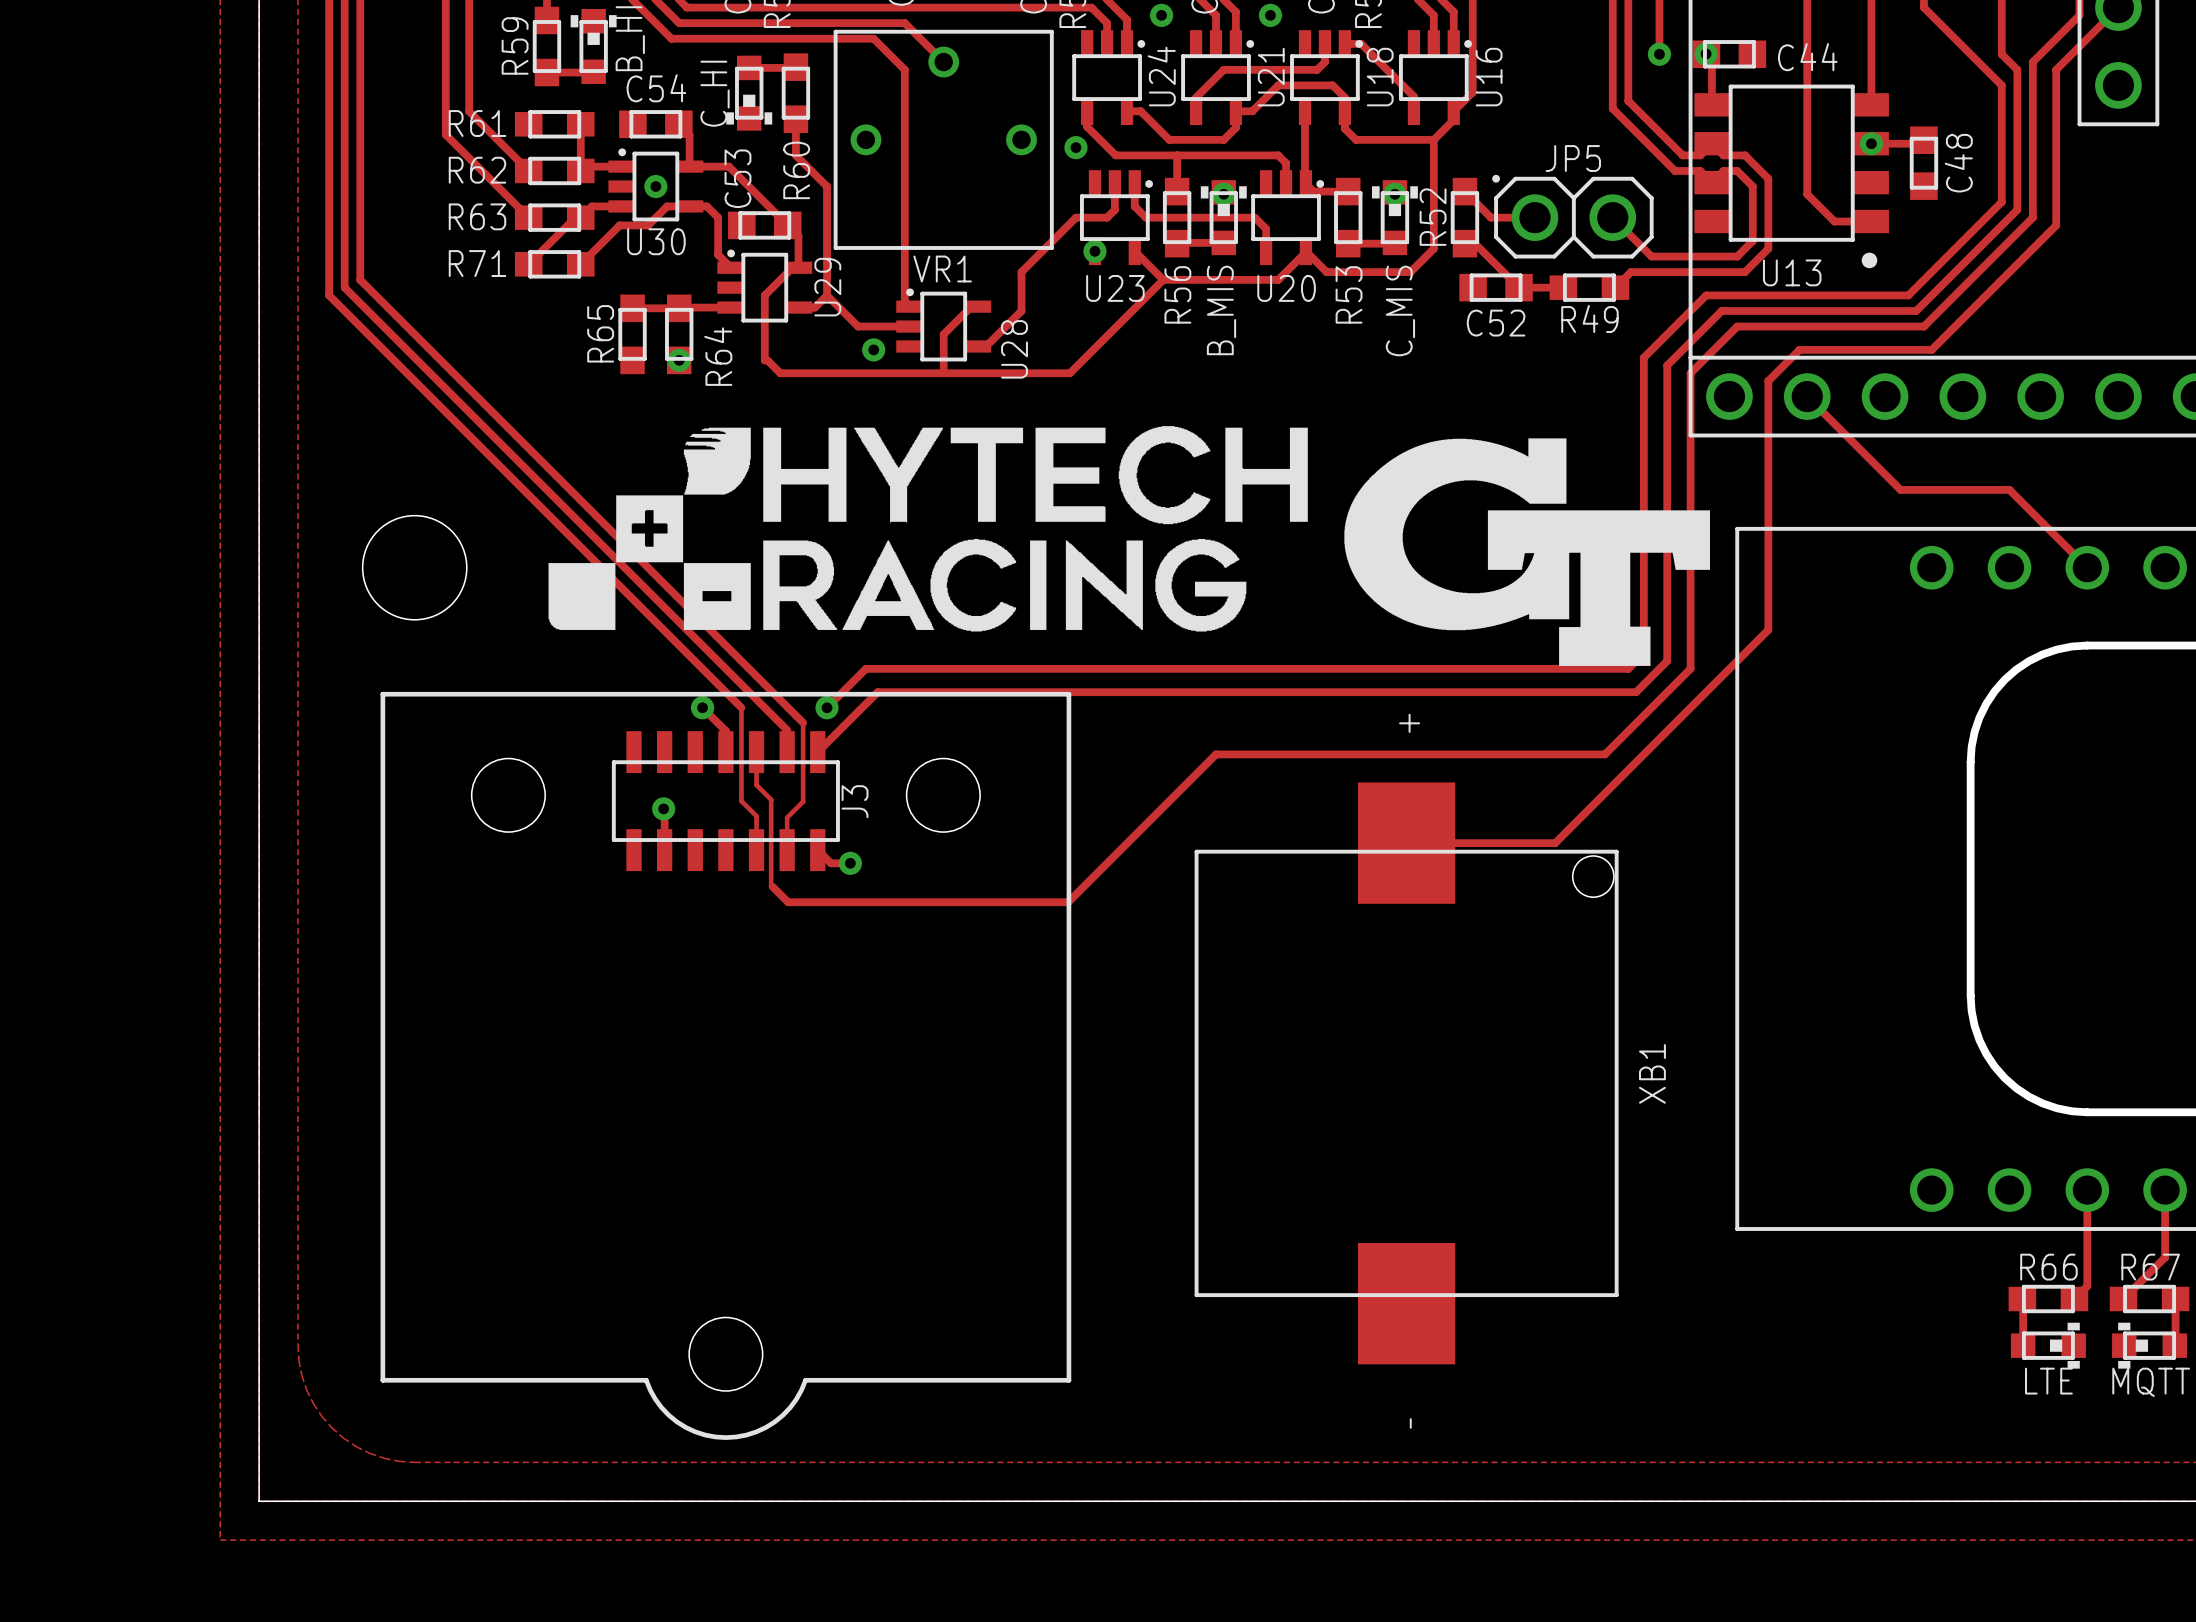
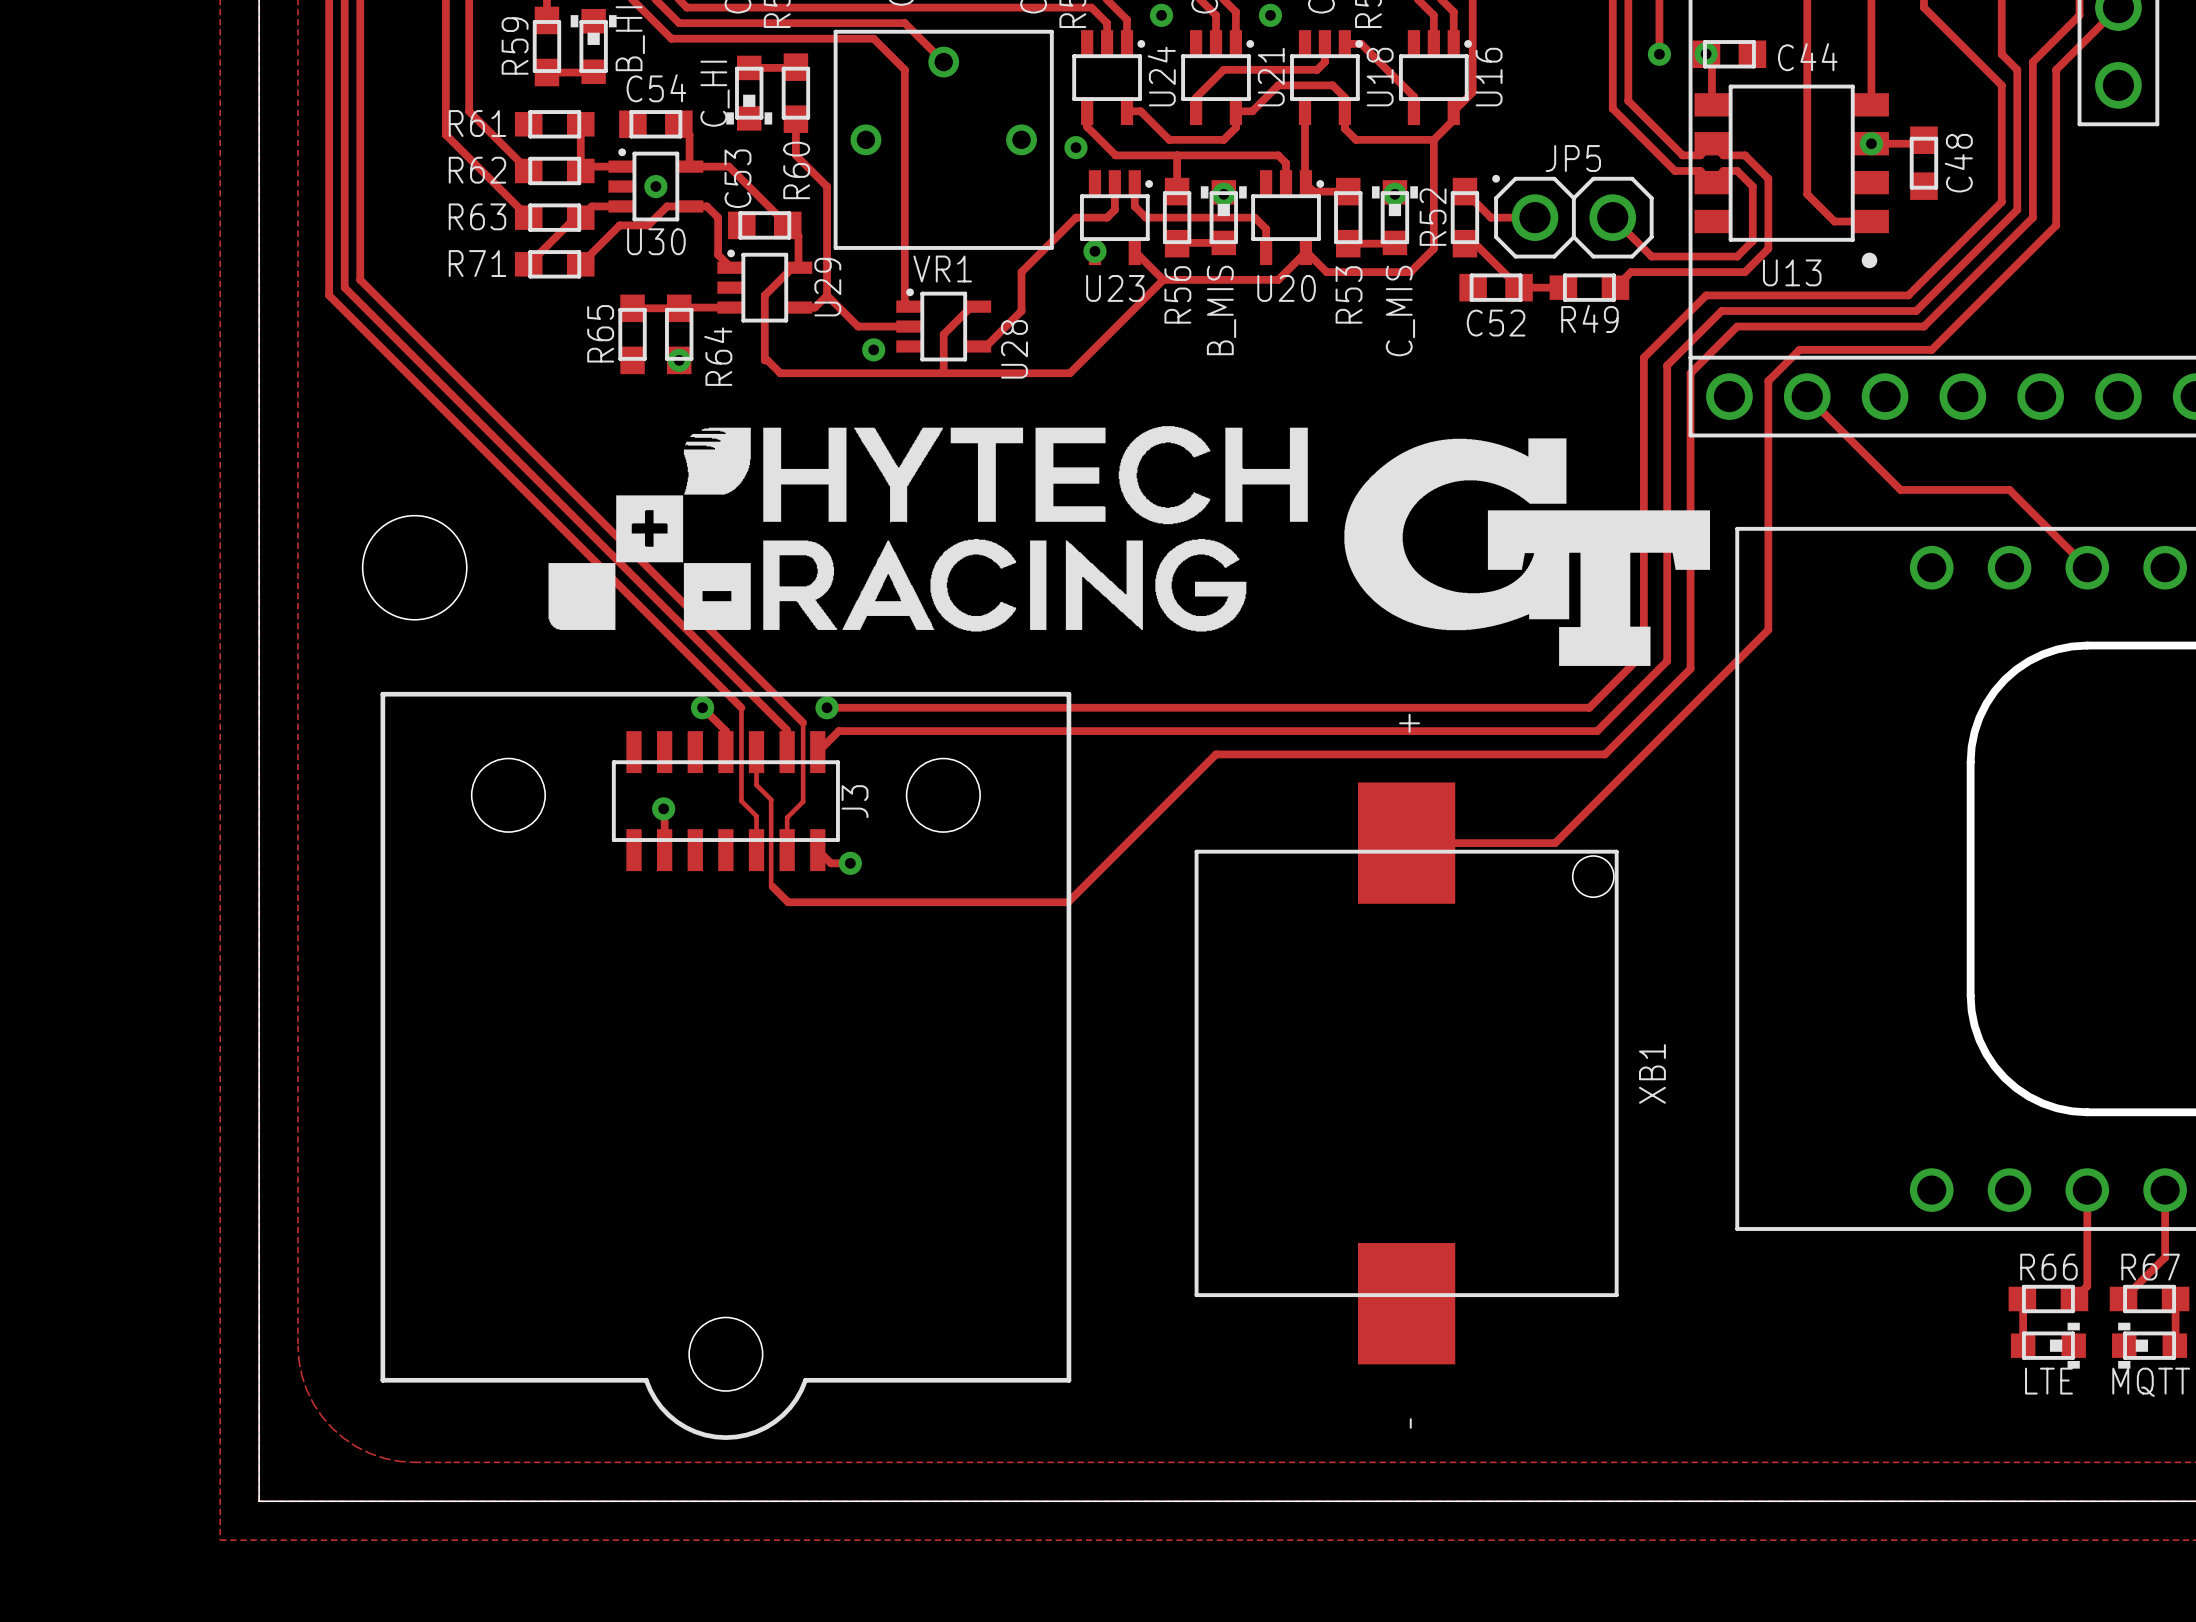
track: (1628, 668) (865, 668) (827, 707) -> (1628, 668) (1589, 707) (827, 707)
track: (1636, 692) (877, 692) (838, 731) -> (1636, 692) (1597, 731) (838, 731)

